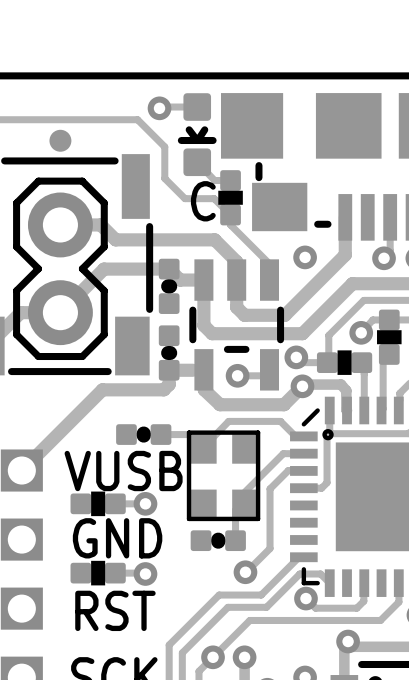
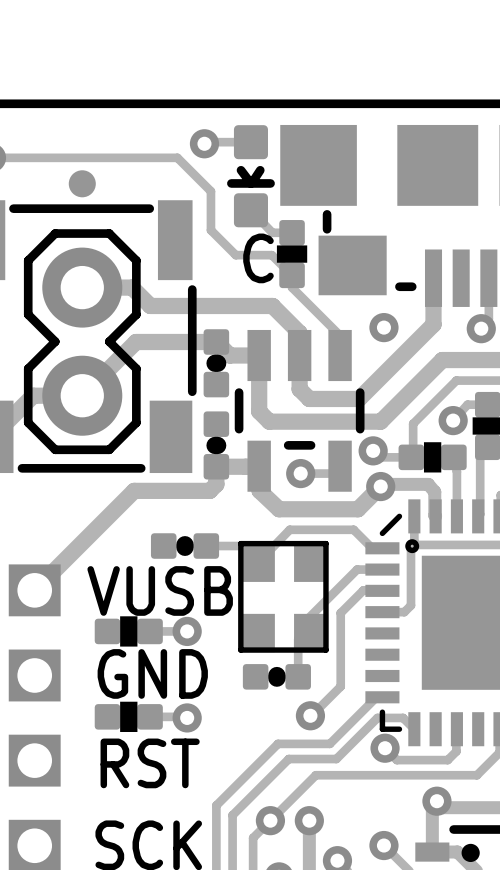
part footprint: [189, 259, 285, 391] -> [234, 329, 365, 492]

